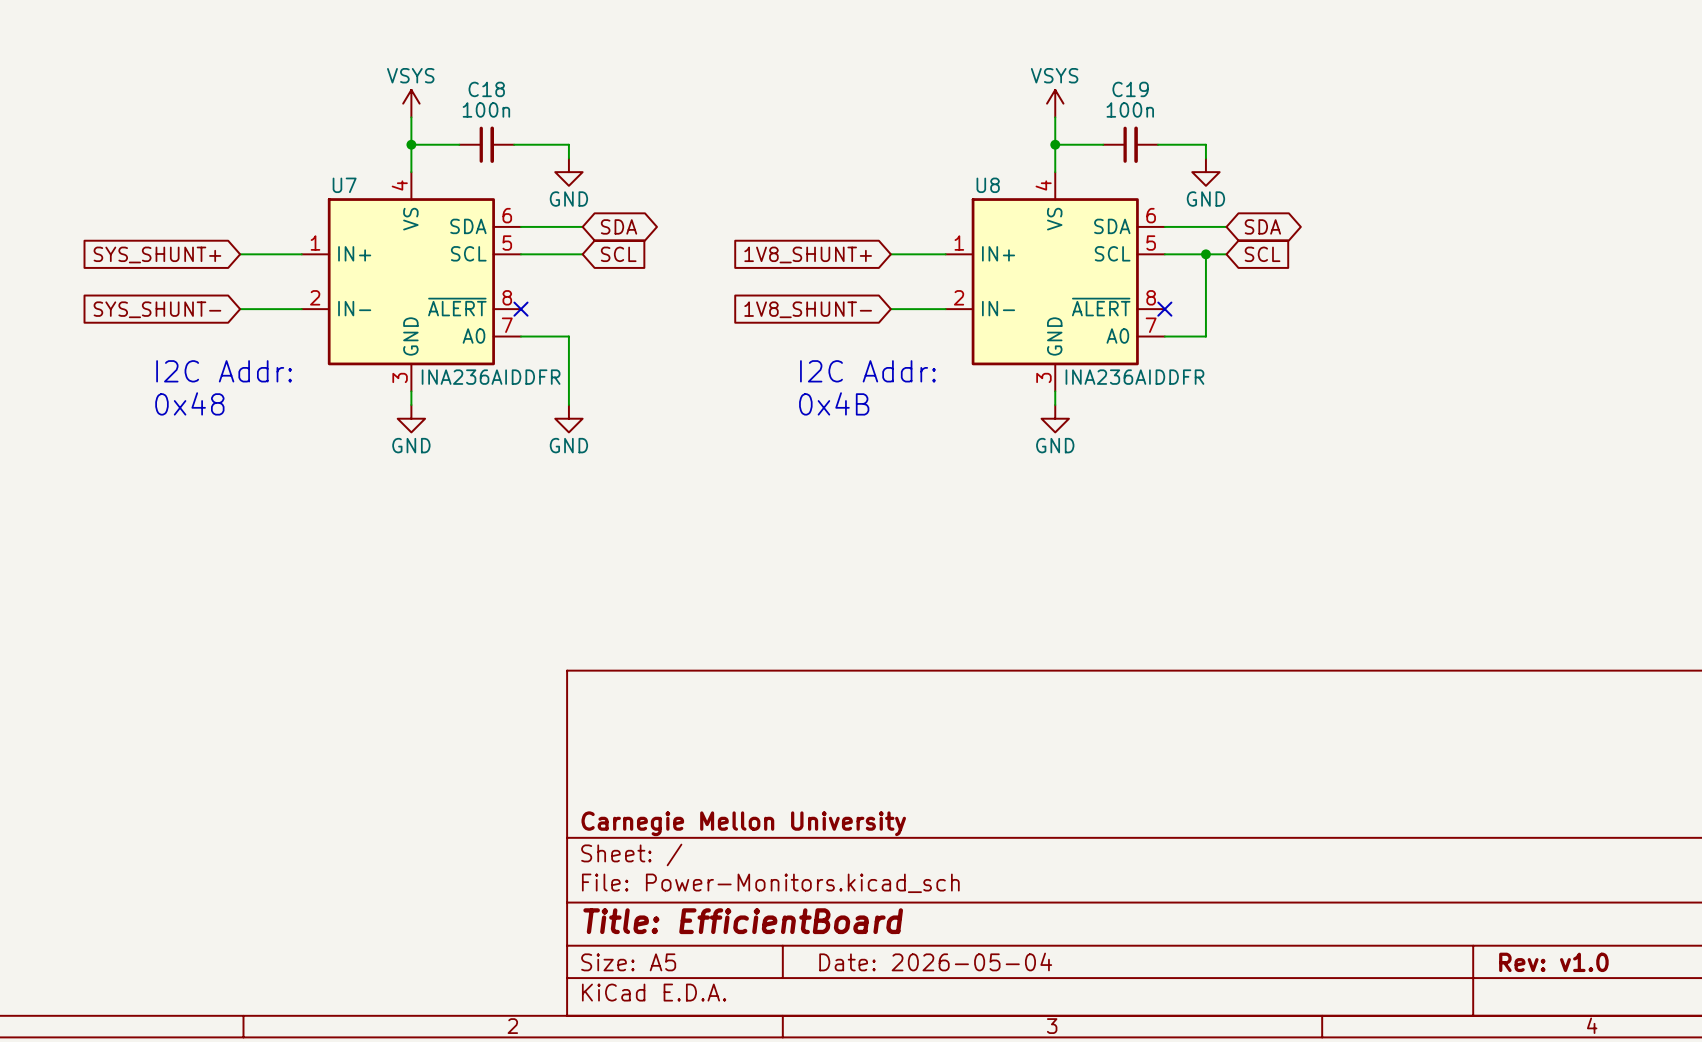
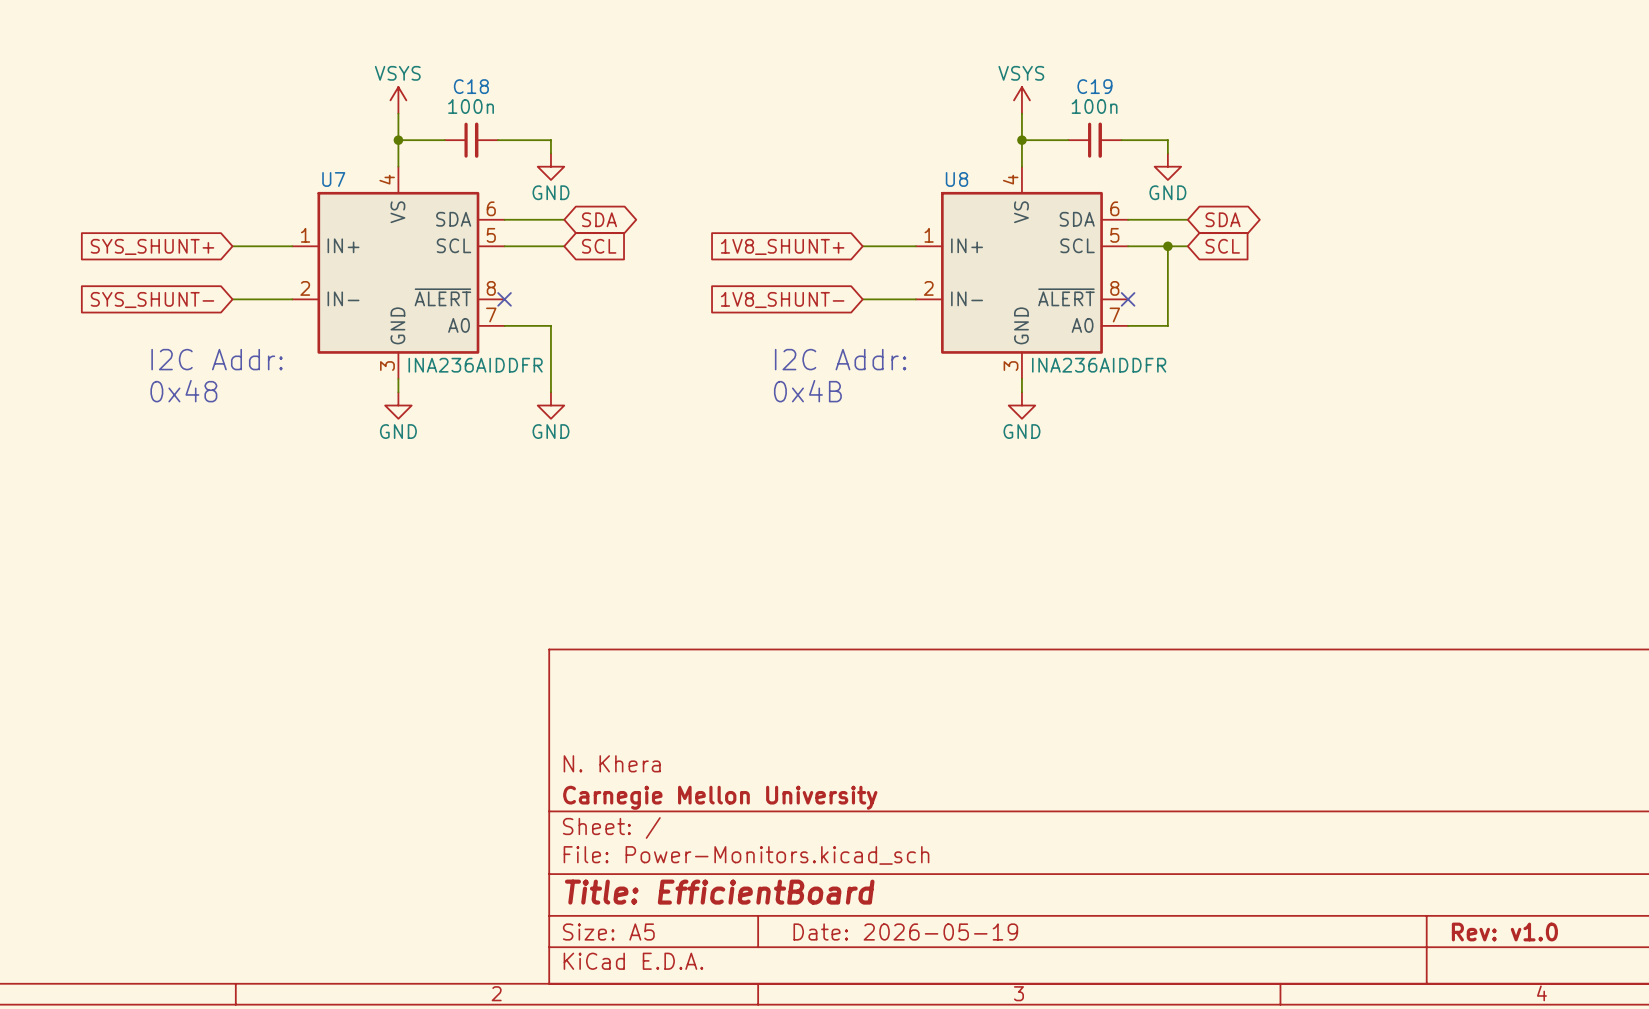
title block: none -> N. Khera (612, 763)
title block: Date: 2026-05-04 (935, 961) -> Date: 2026-05-19 (905, 932)

